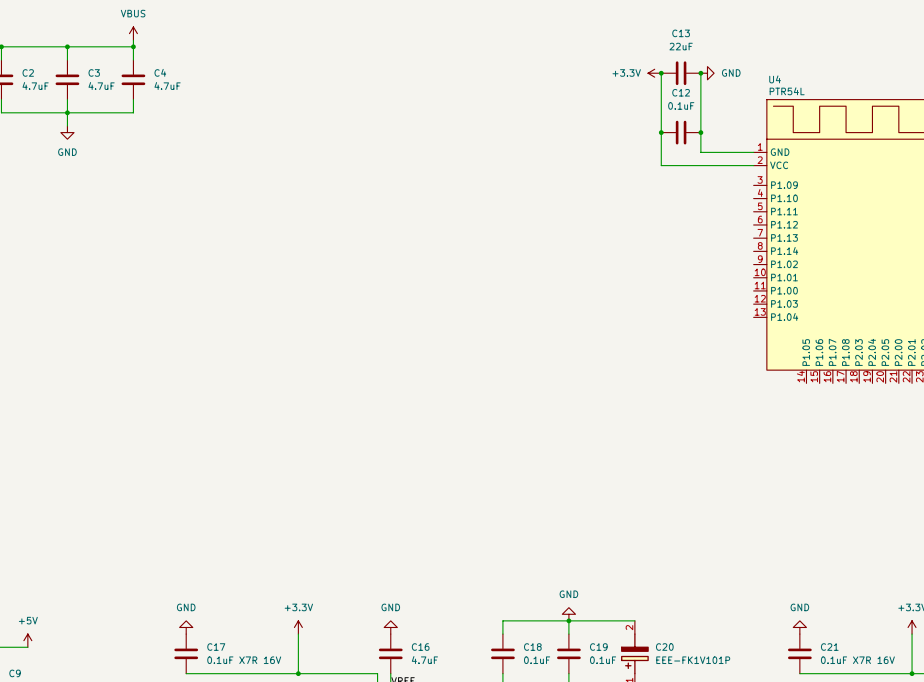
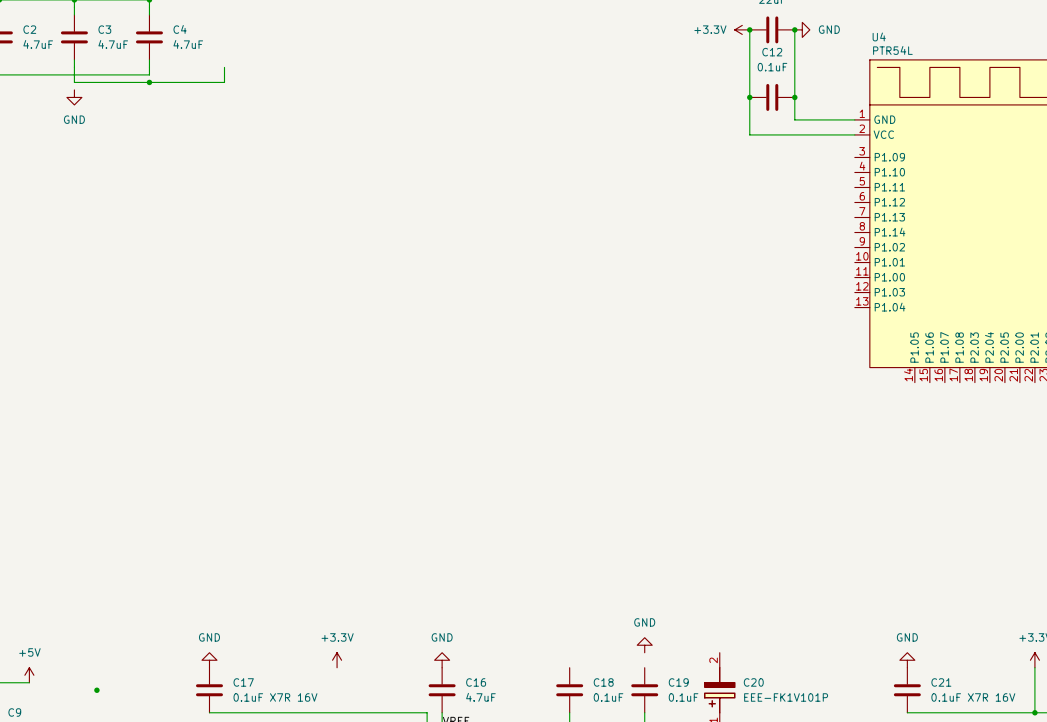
junction: (67, 112) -> none
wire: (67, 119) (67, 126) -> (74, 82) (224, 82) (224, 67)
junction: none -> (149, 82)
wire: (568, 620) (568, 634) -> none
junction: (568, 620) -> none
wire: (634, 620) (502, 620) (502, 634) -> none
wire: (298, 634) (298, 673) -> none
junction: none -> (96, 690)
junction: (298, 673) -> none

